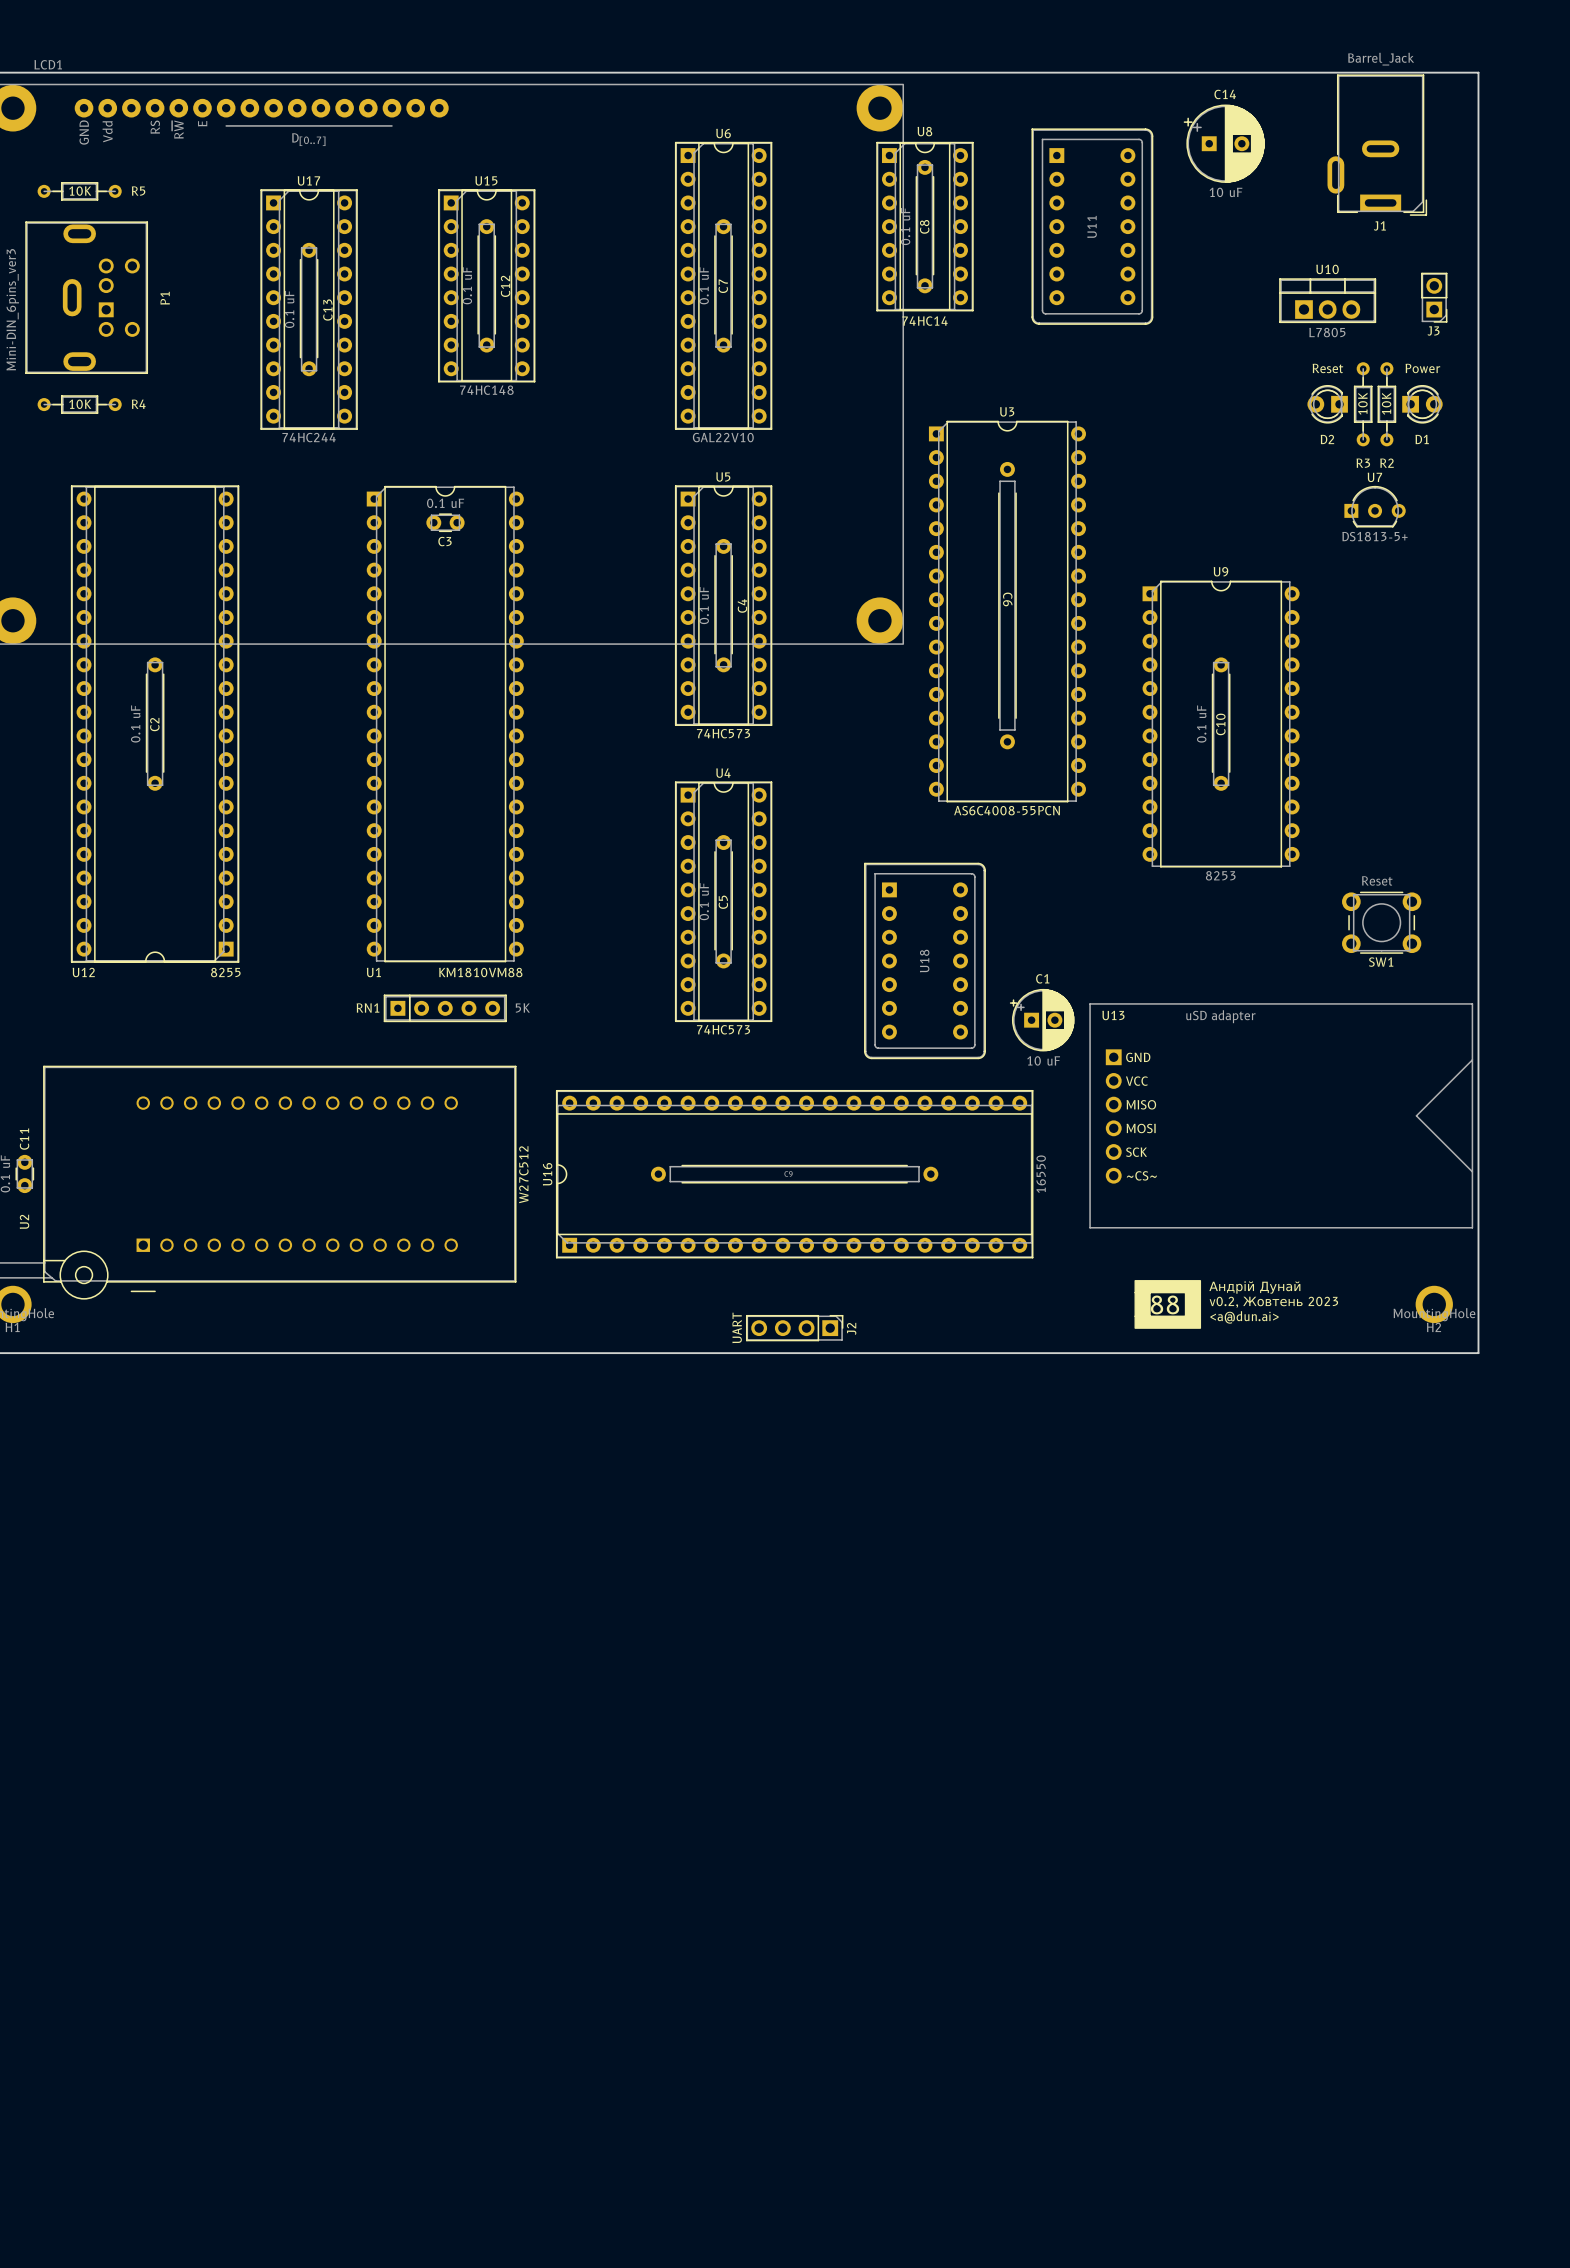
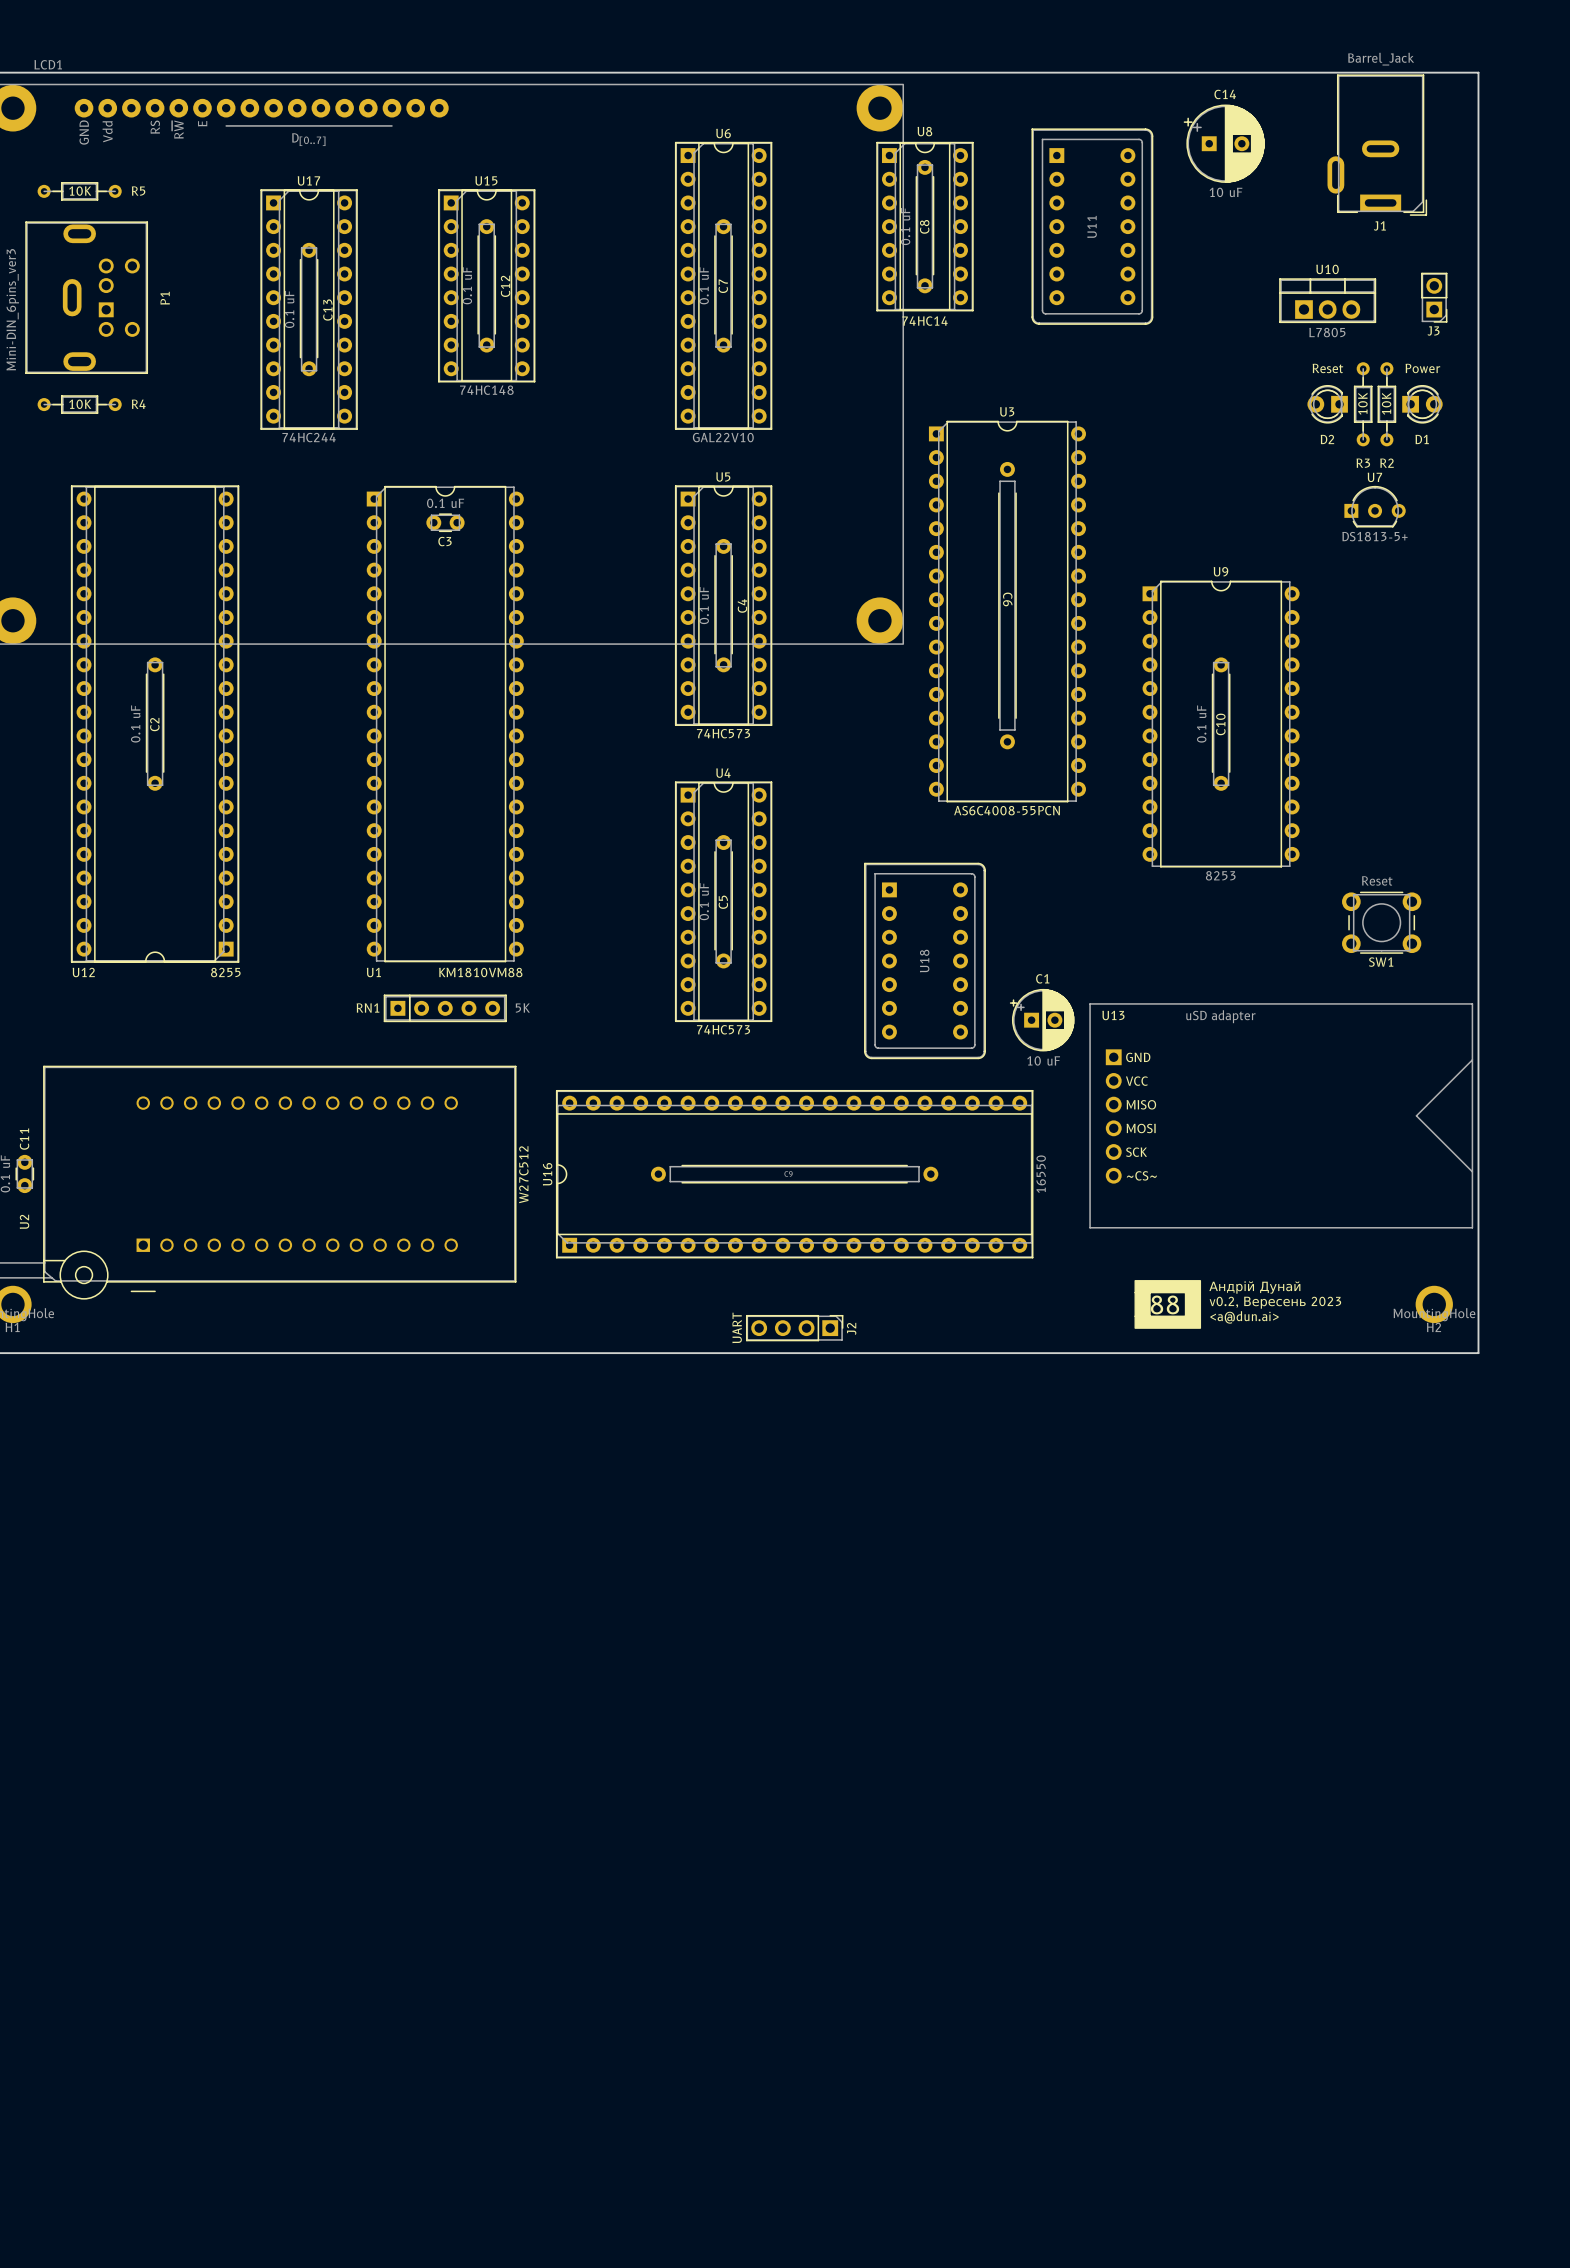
text: v0.2, Жовтень 2023 (1273, 1302) -> v0.2, Вересень 2023 (1275, 1302)

